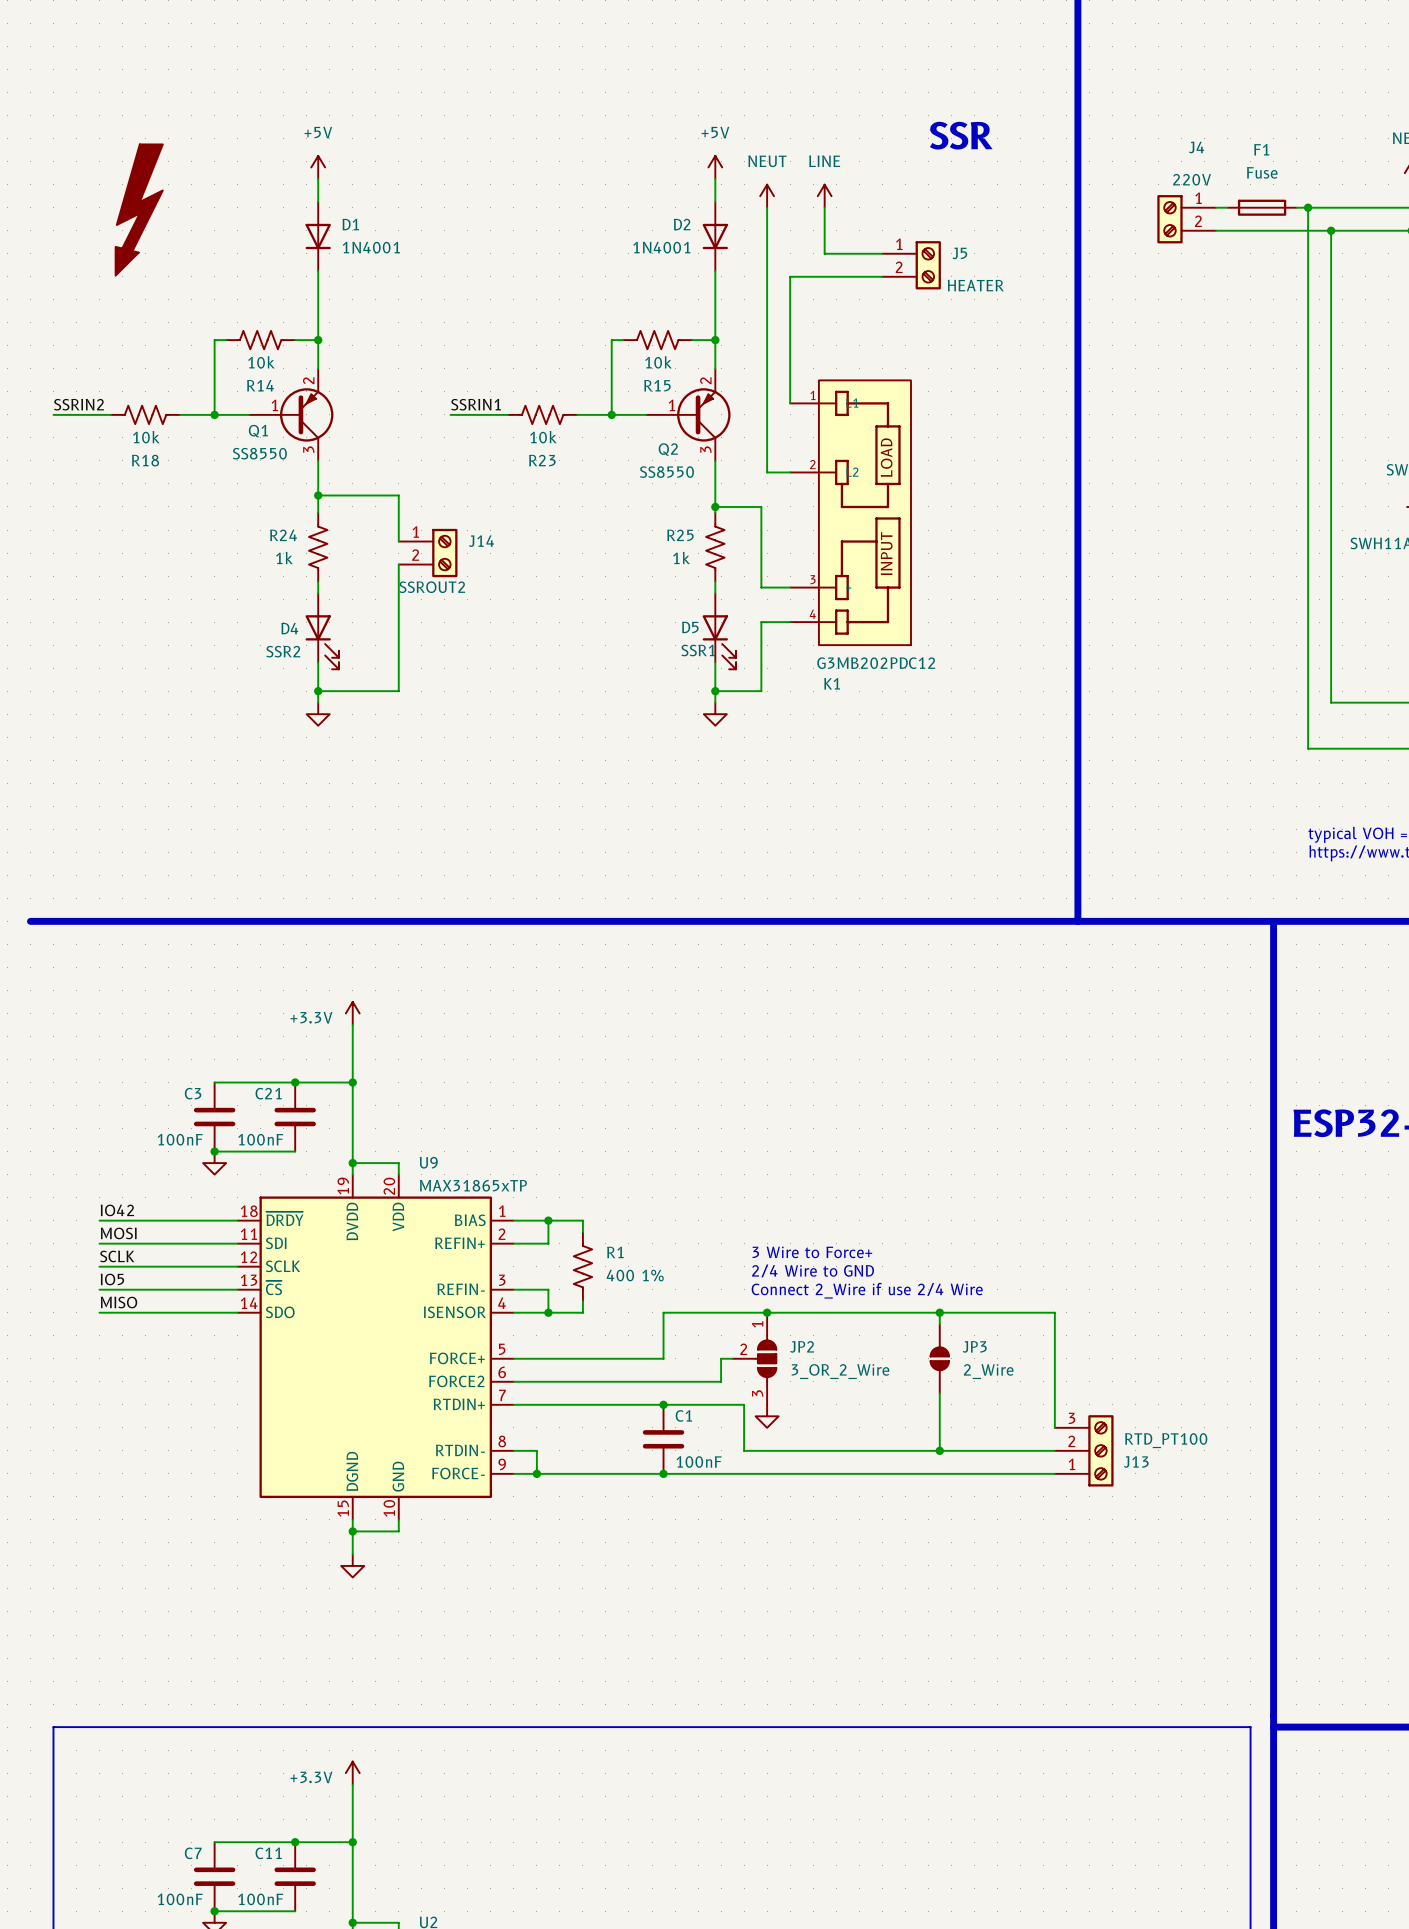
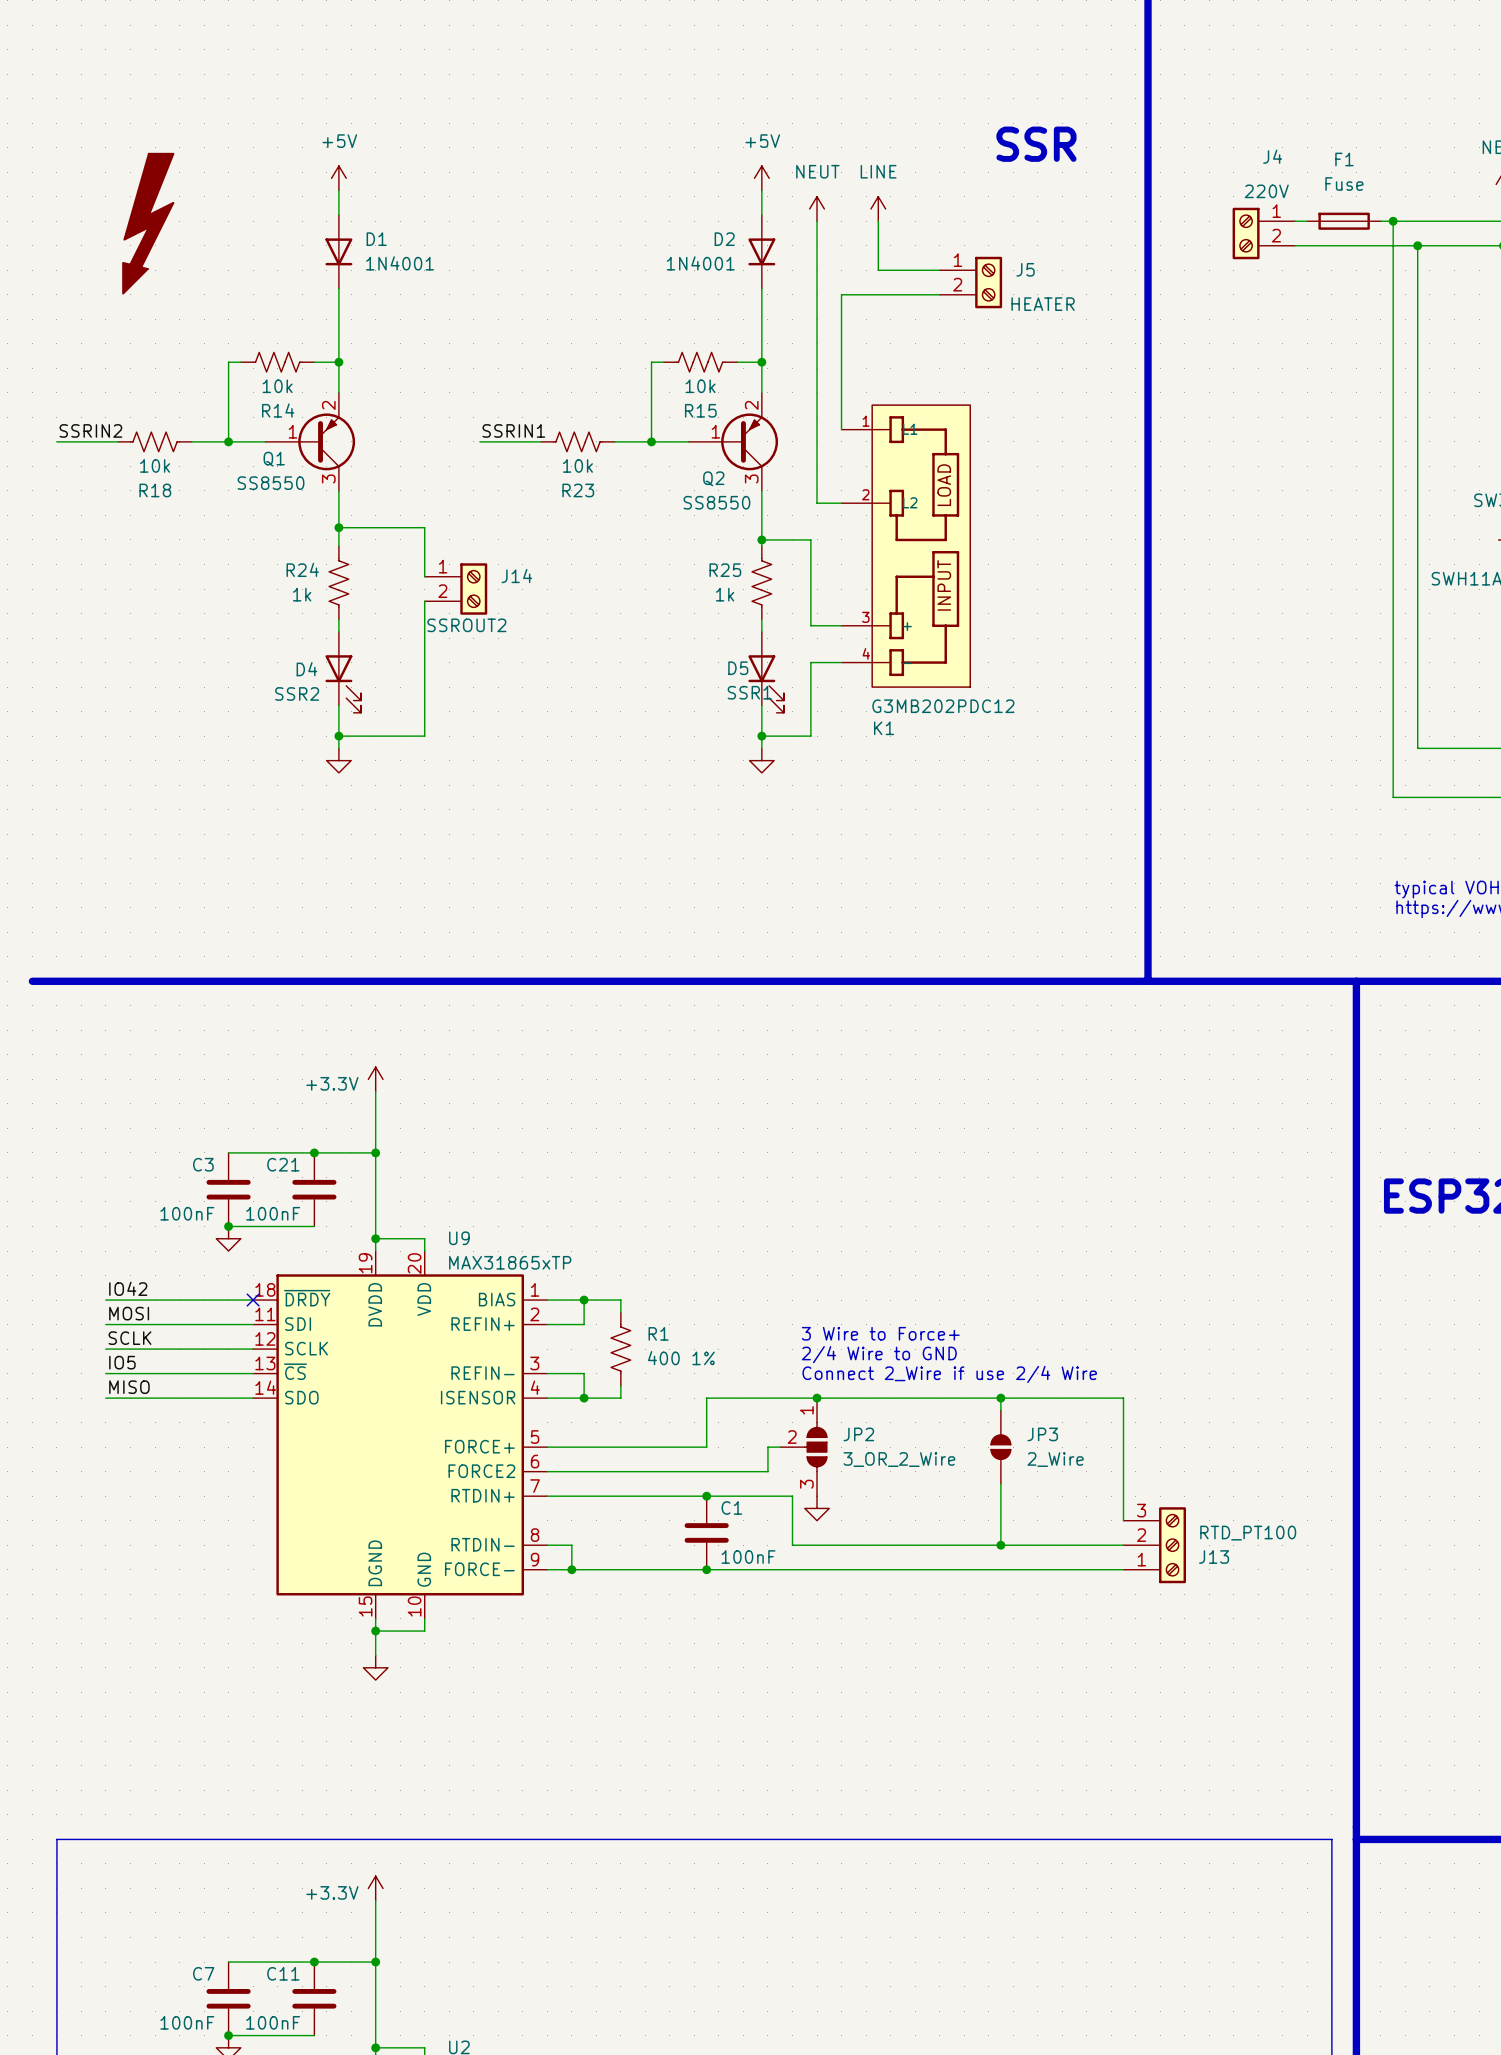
no-connect mark: none -> (253, 1300)

